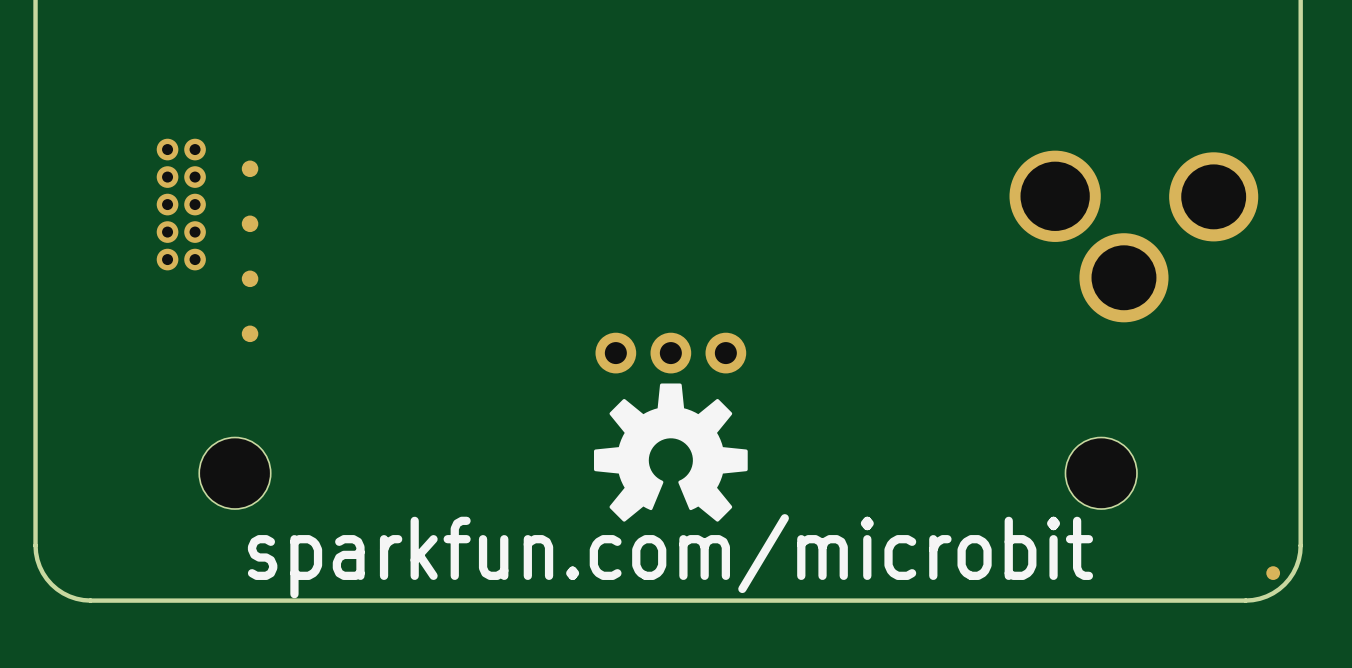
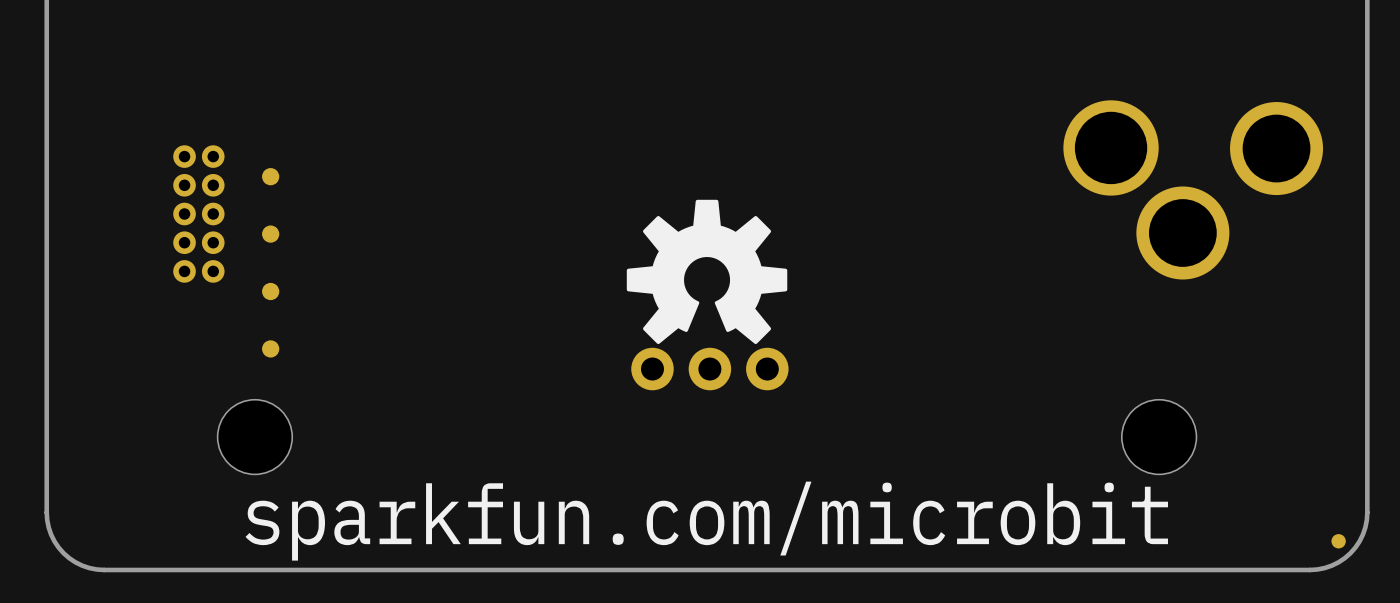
part position: (250, 168) -> (270, 348)
part position: (181, 204) -> (198, 214)
part position: (670, 353) -> (709, 369)
drawing position: (670, 452) -> (707, 271)

